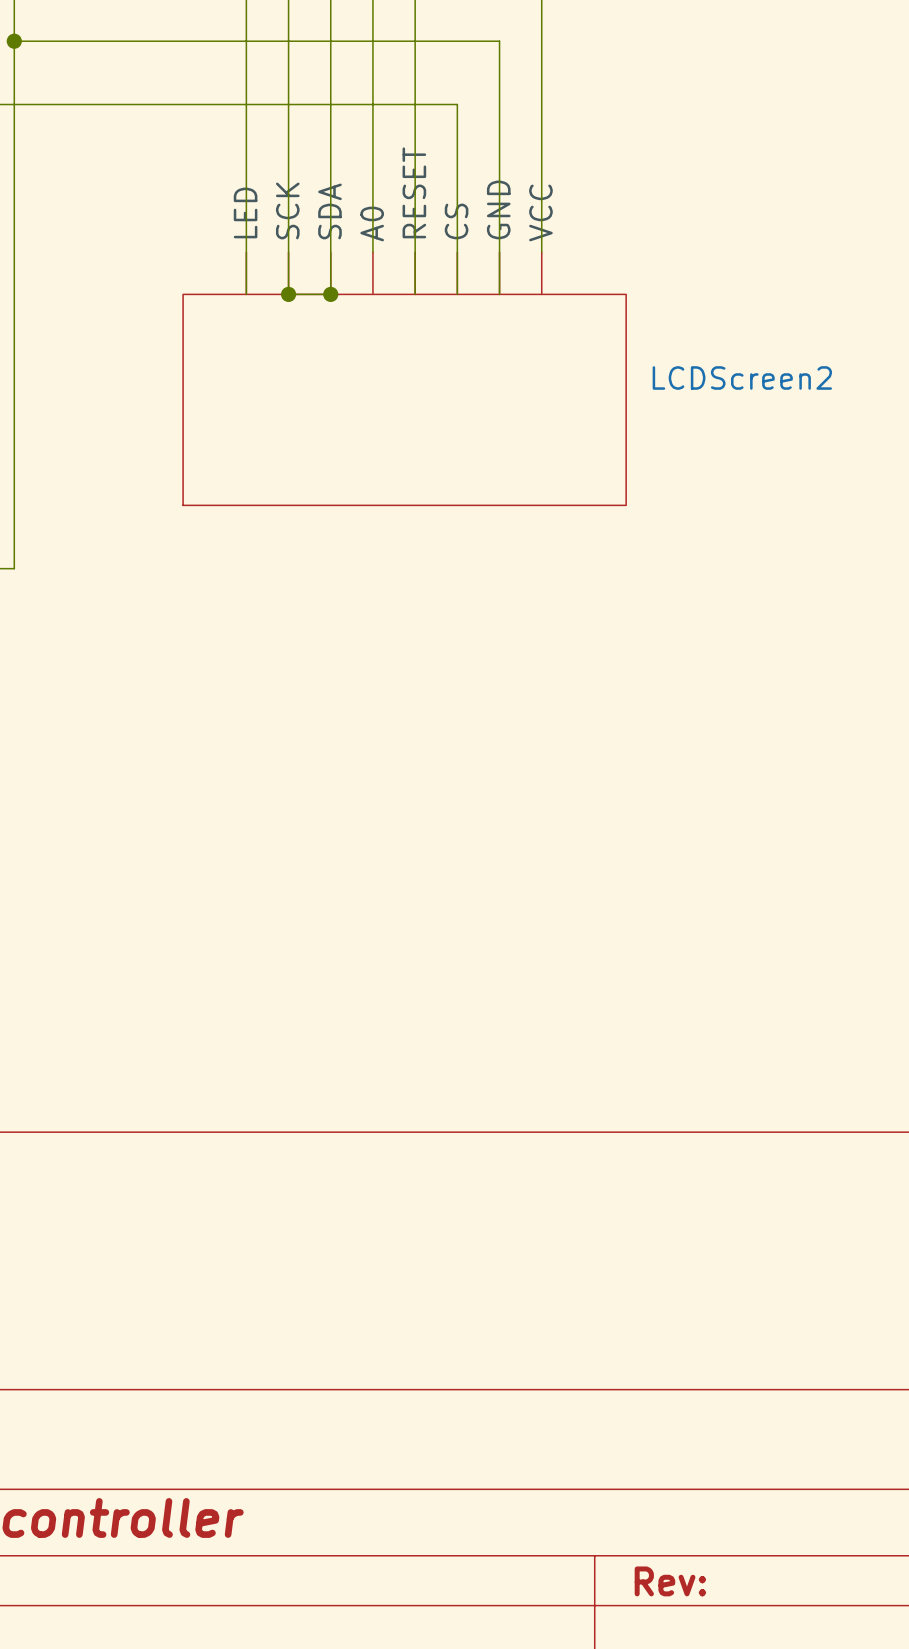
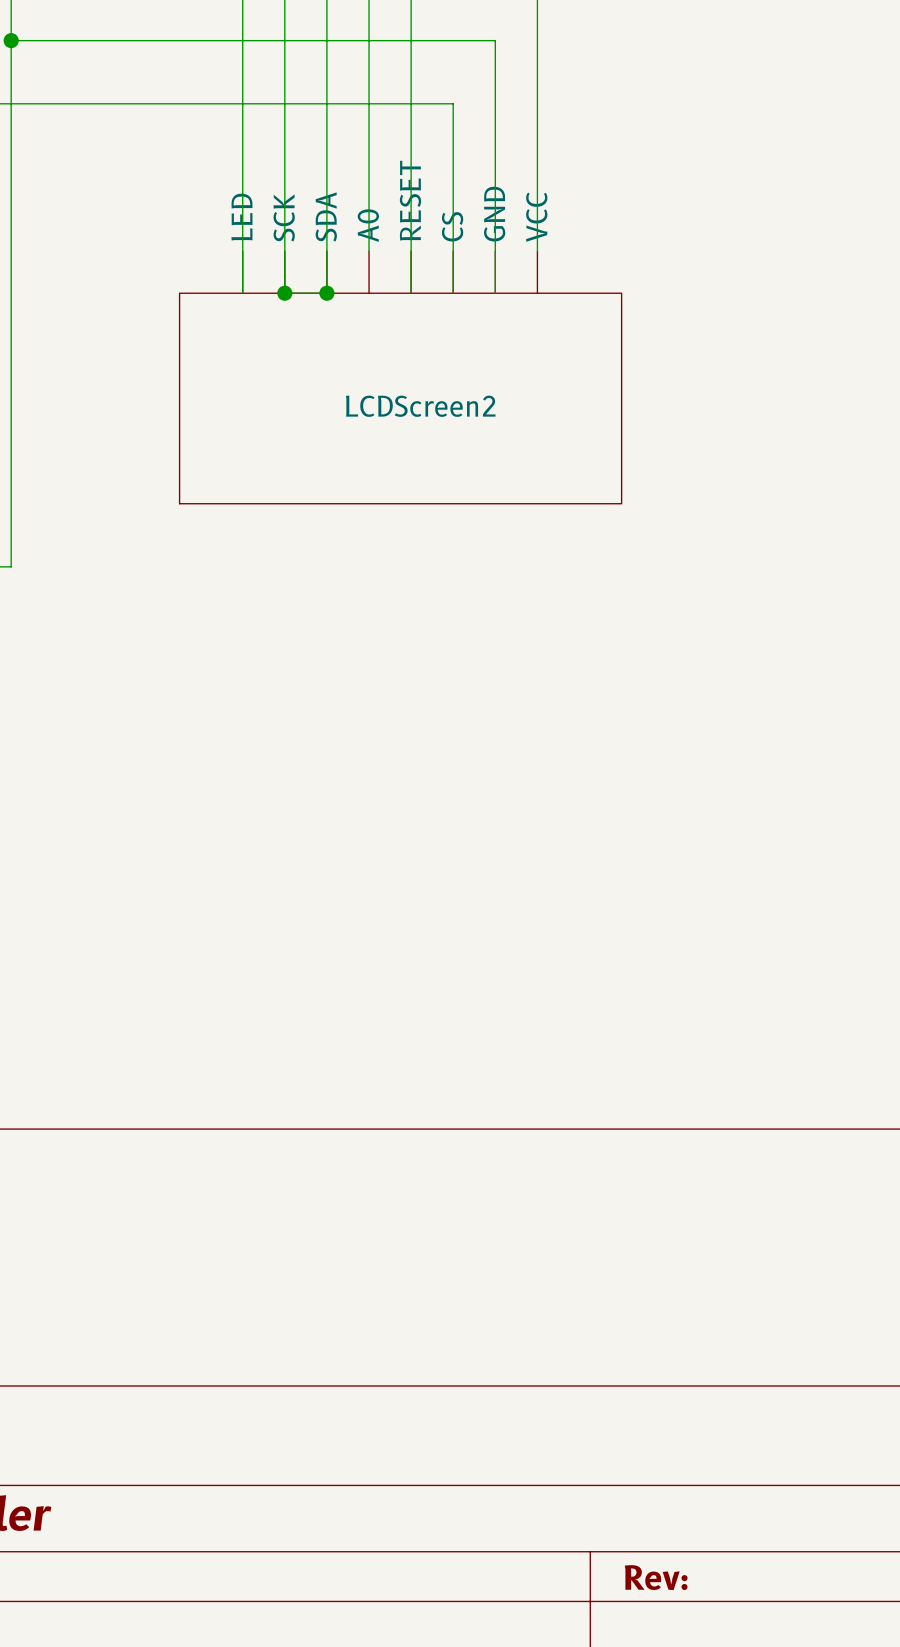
LCDScreen2 name position: LCDScreen2 (742, 377) -> LCDScreen2 (420, 406)

